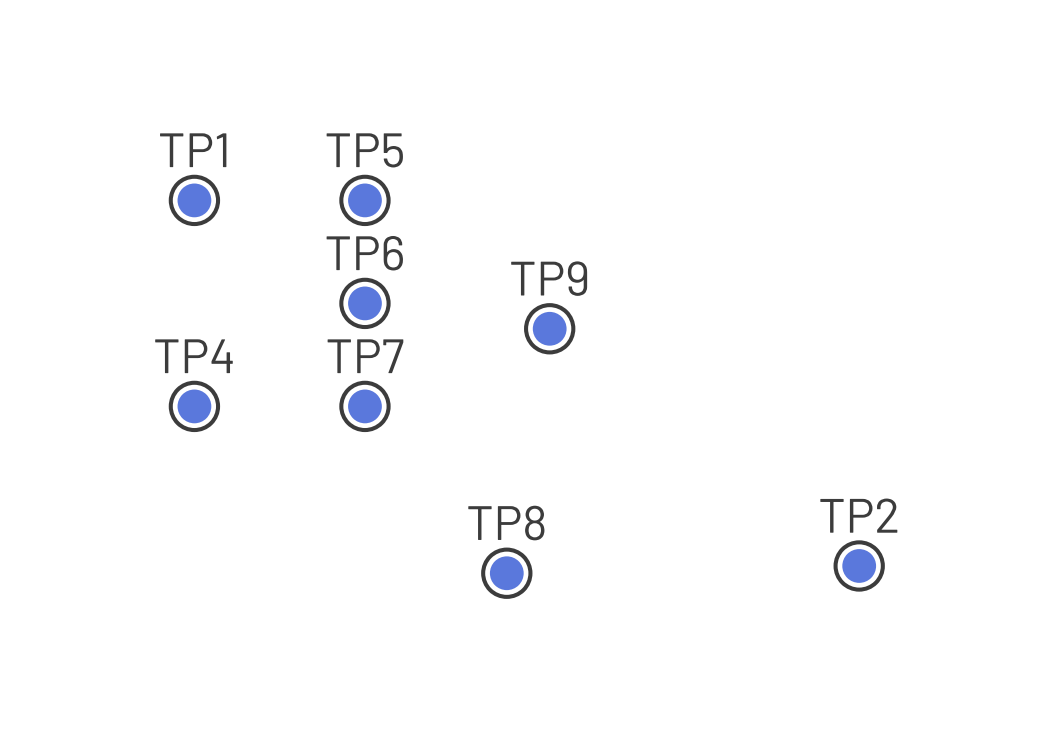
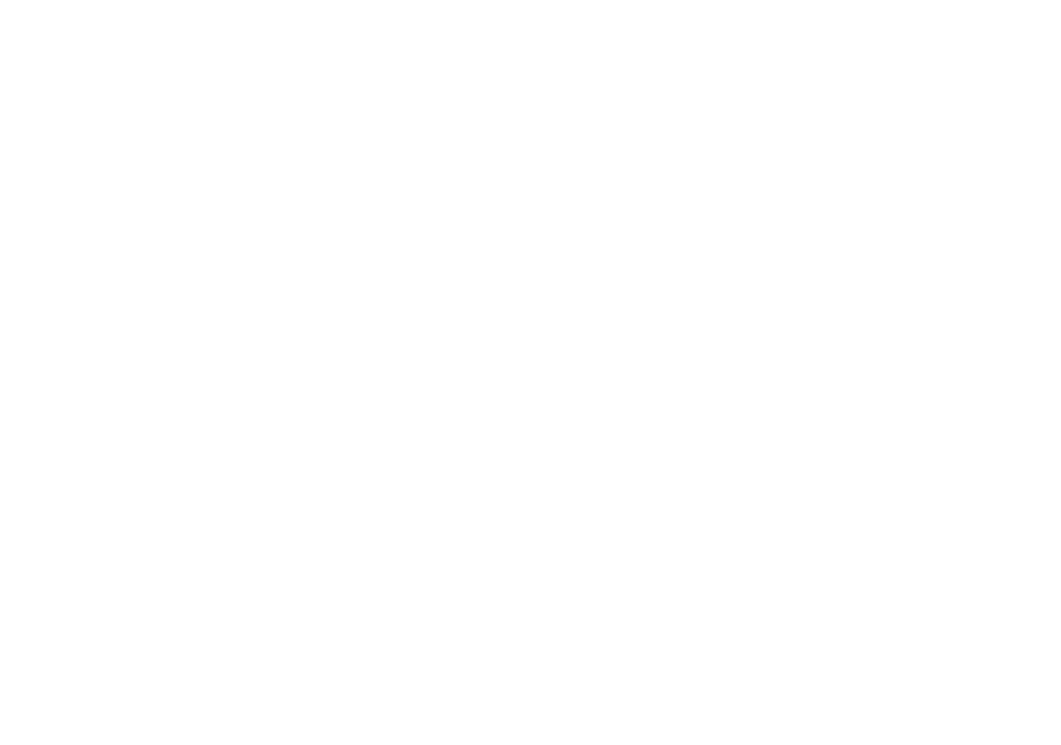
TP1: (194, 200) -> none
TP5: (364, 200) -> none
TP6: (364, 303) -> none
TP9: (549, 328) -> none
TP4: (194, 406) -> none
TP7: (364, 406) -> none
TP2: (859, 565) -> none
TP8: (506, 573) -> none

